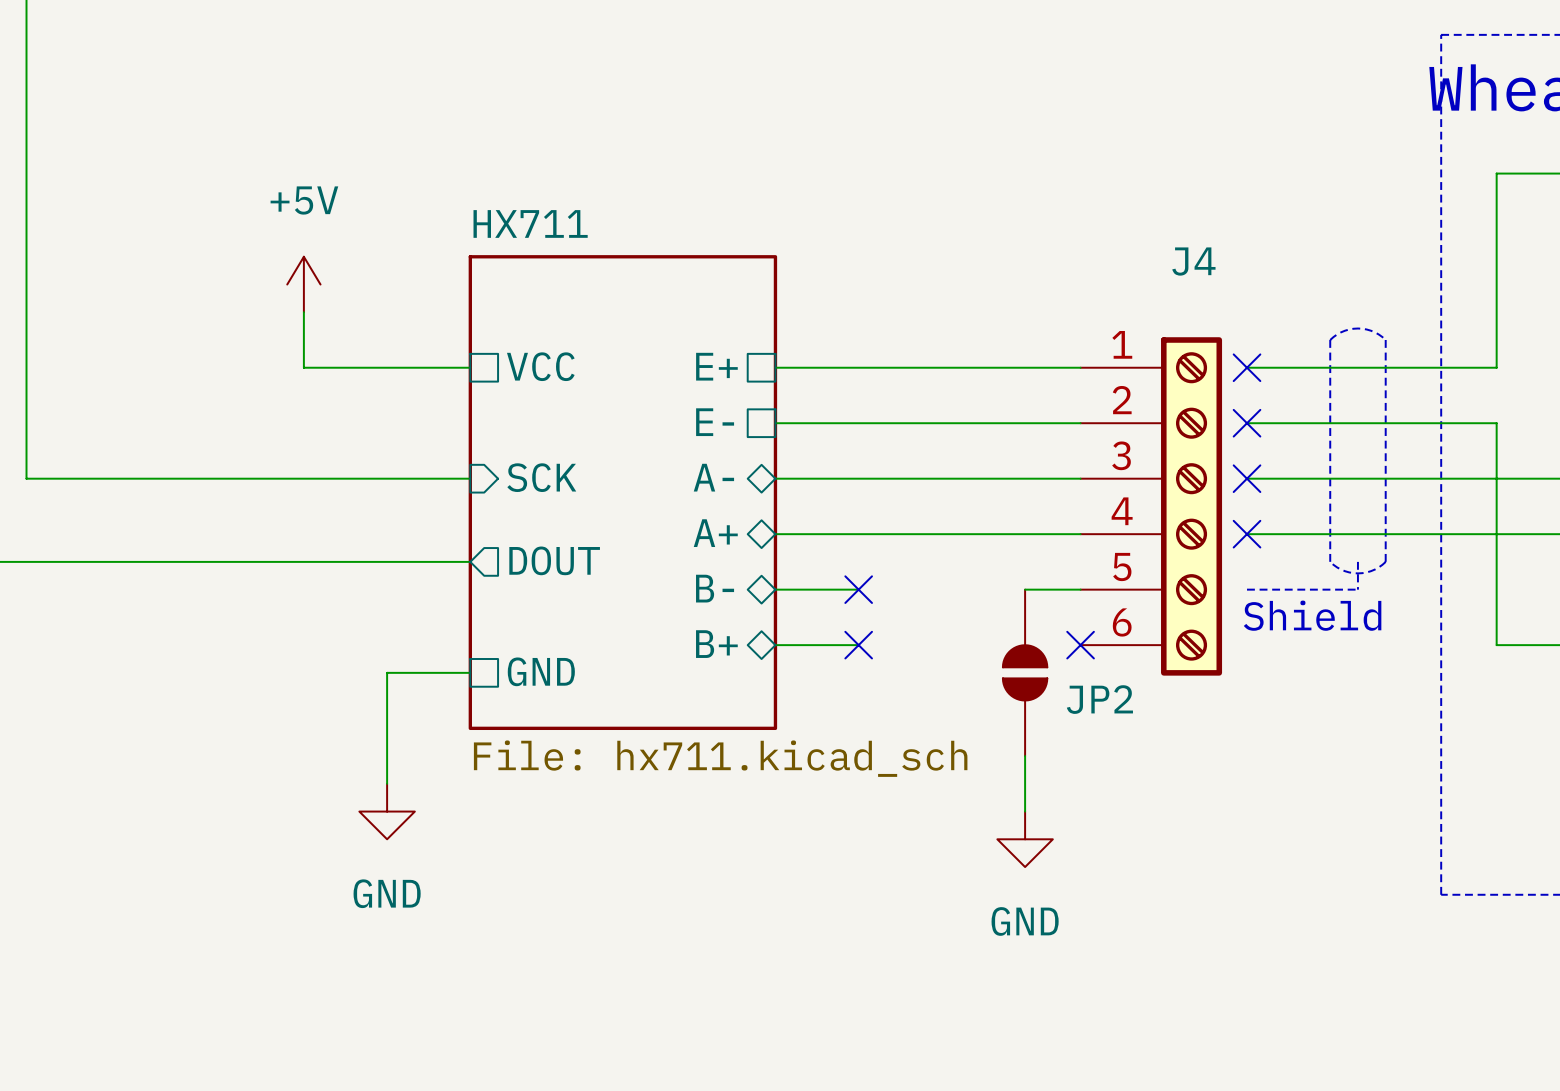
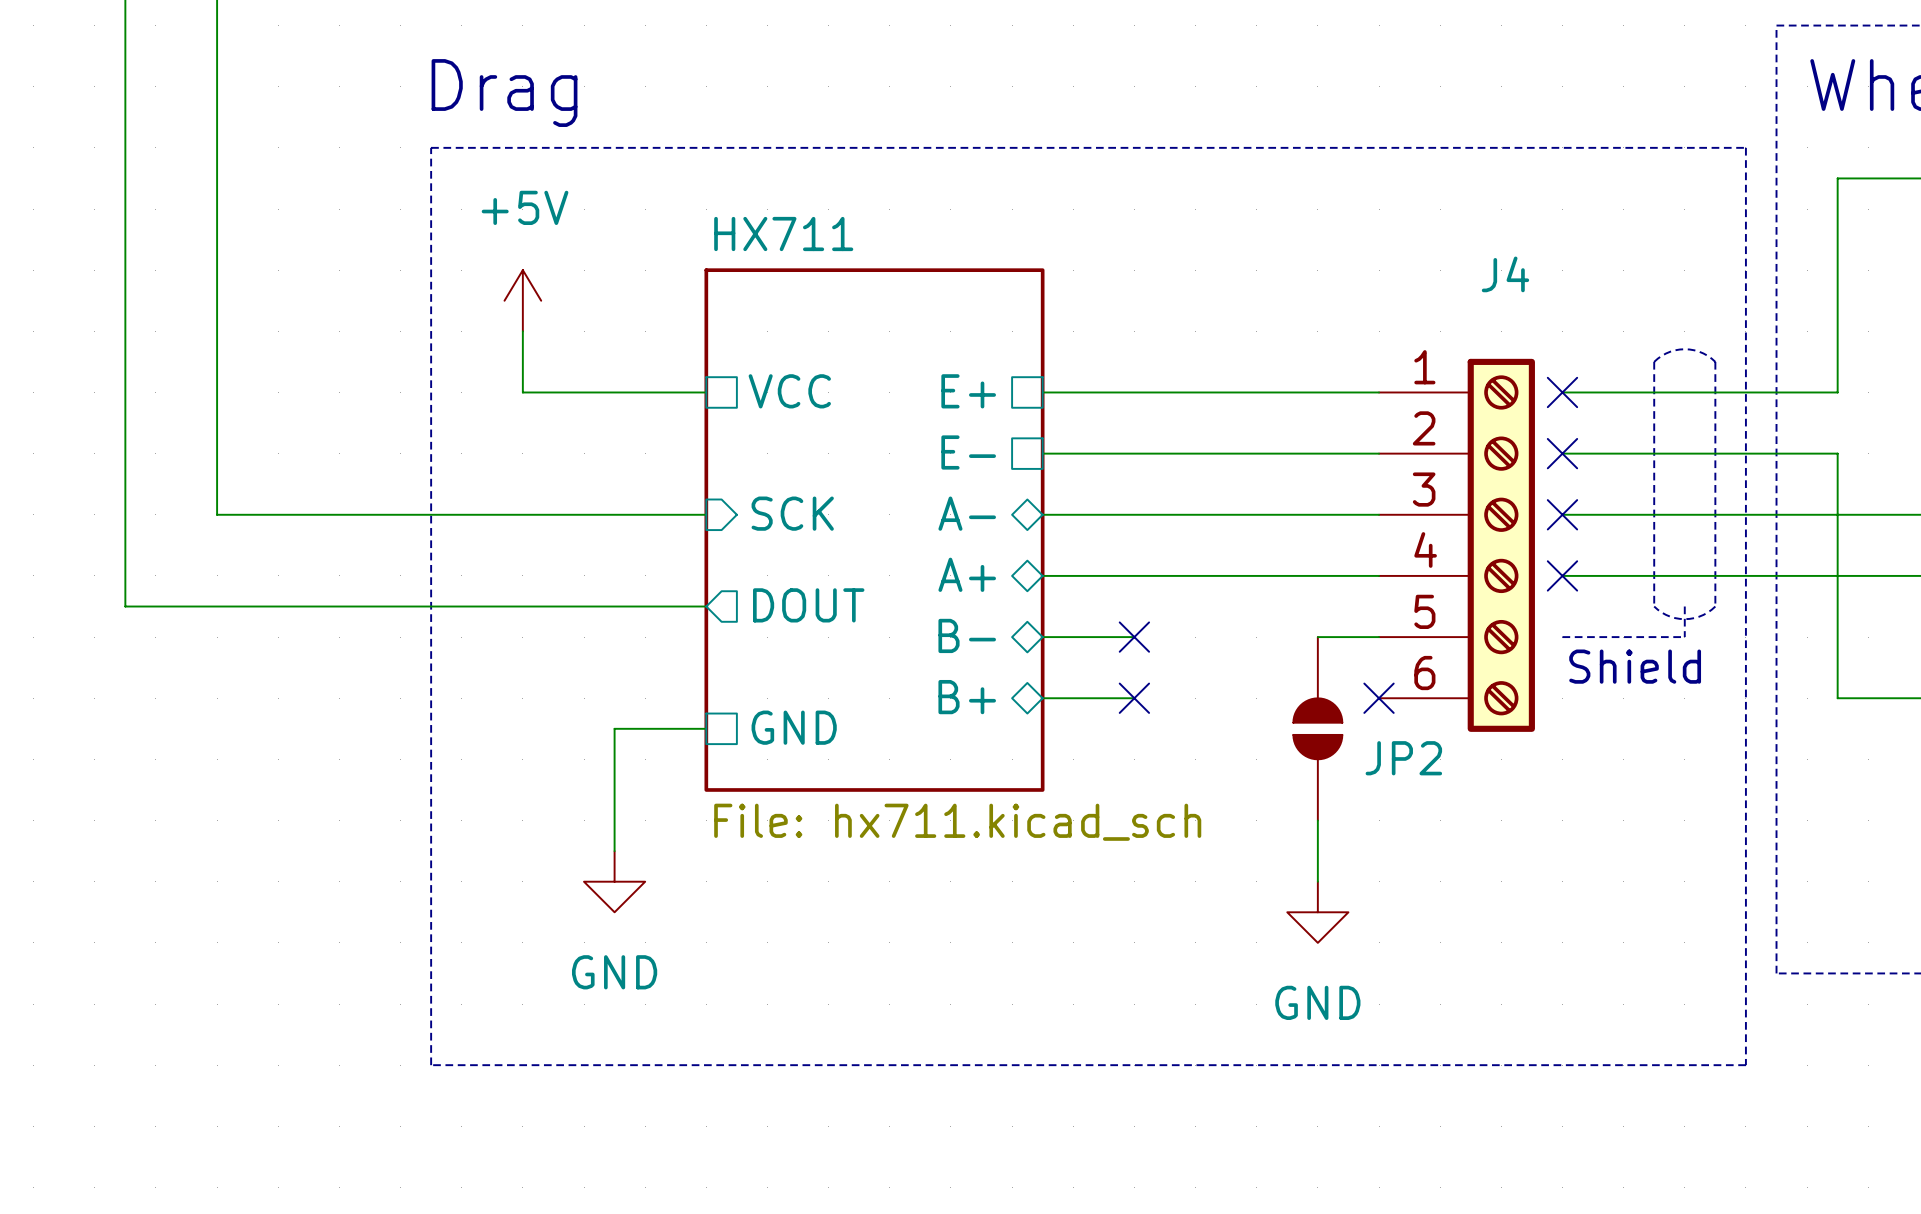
text: none -> Drag (504, 93)
line: none -> (431, 147) (1745, 147) (1745, 1065) (431, 1065) (431, 147)

